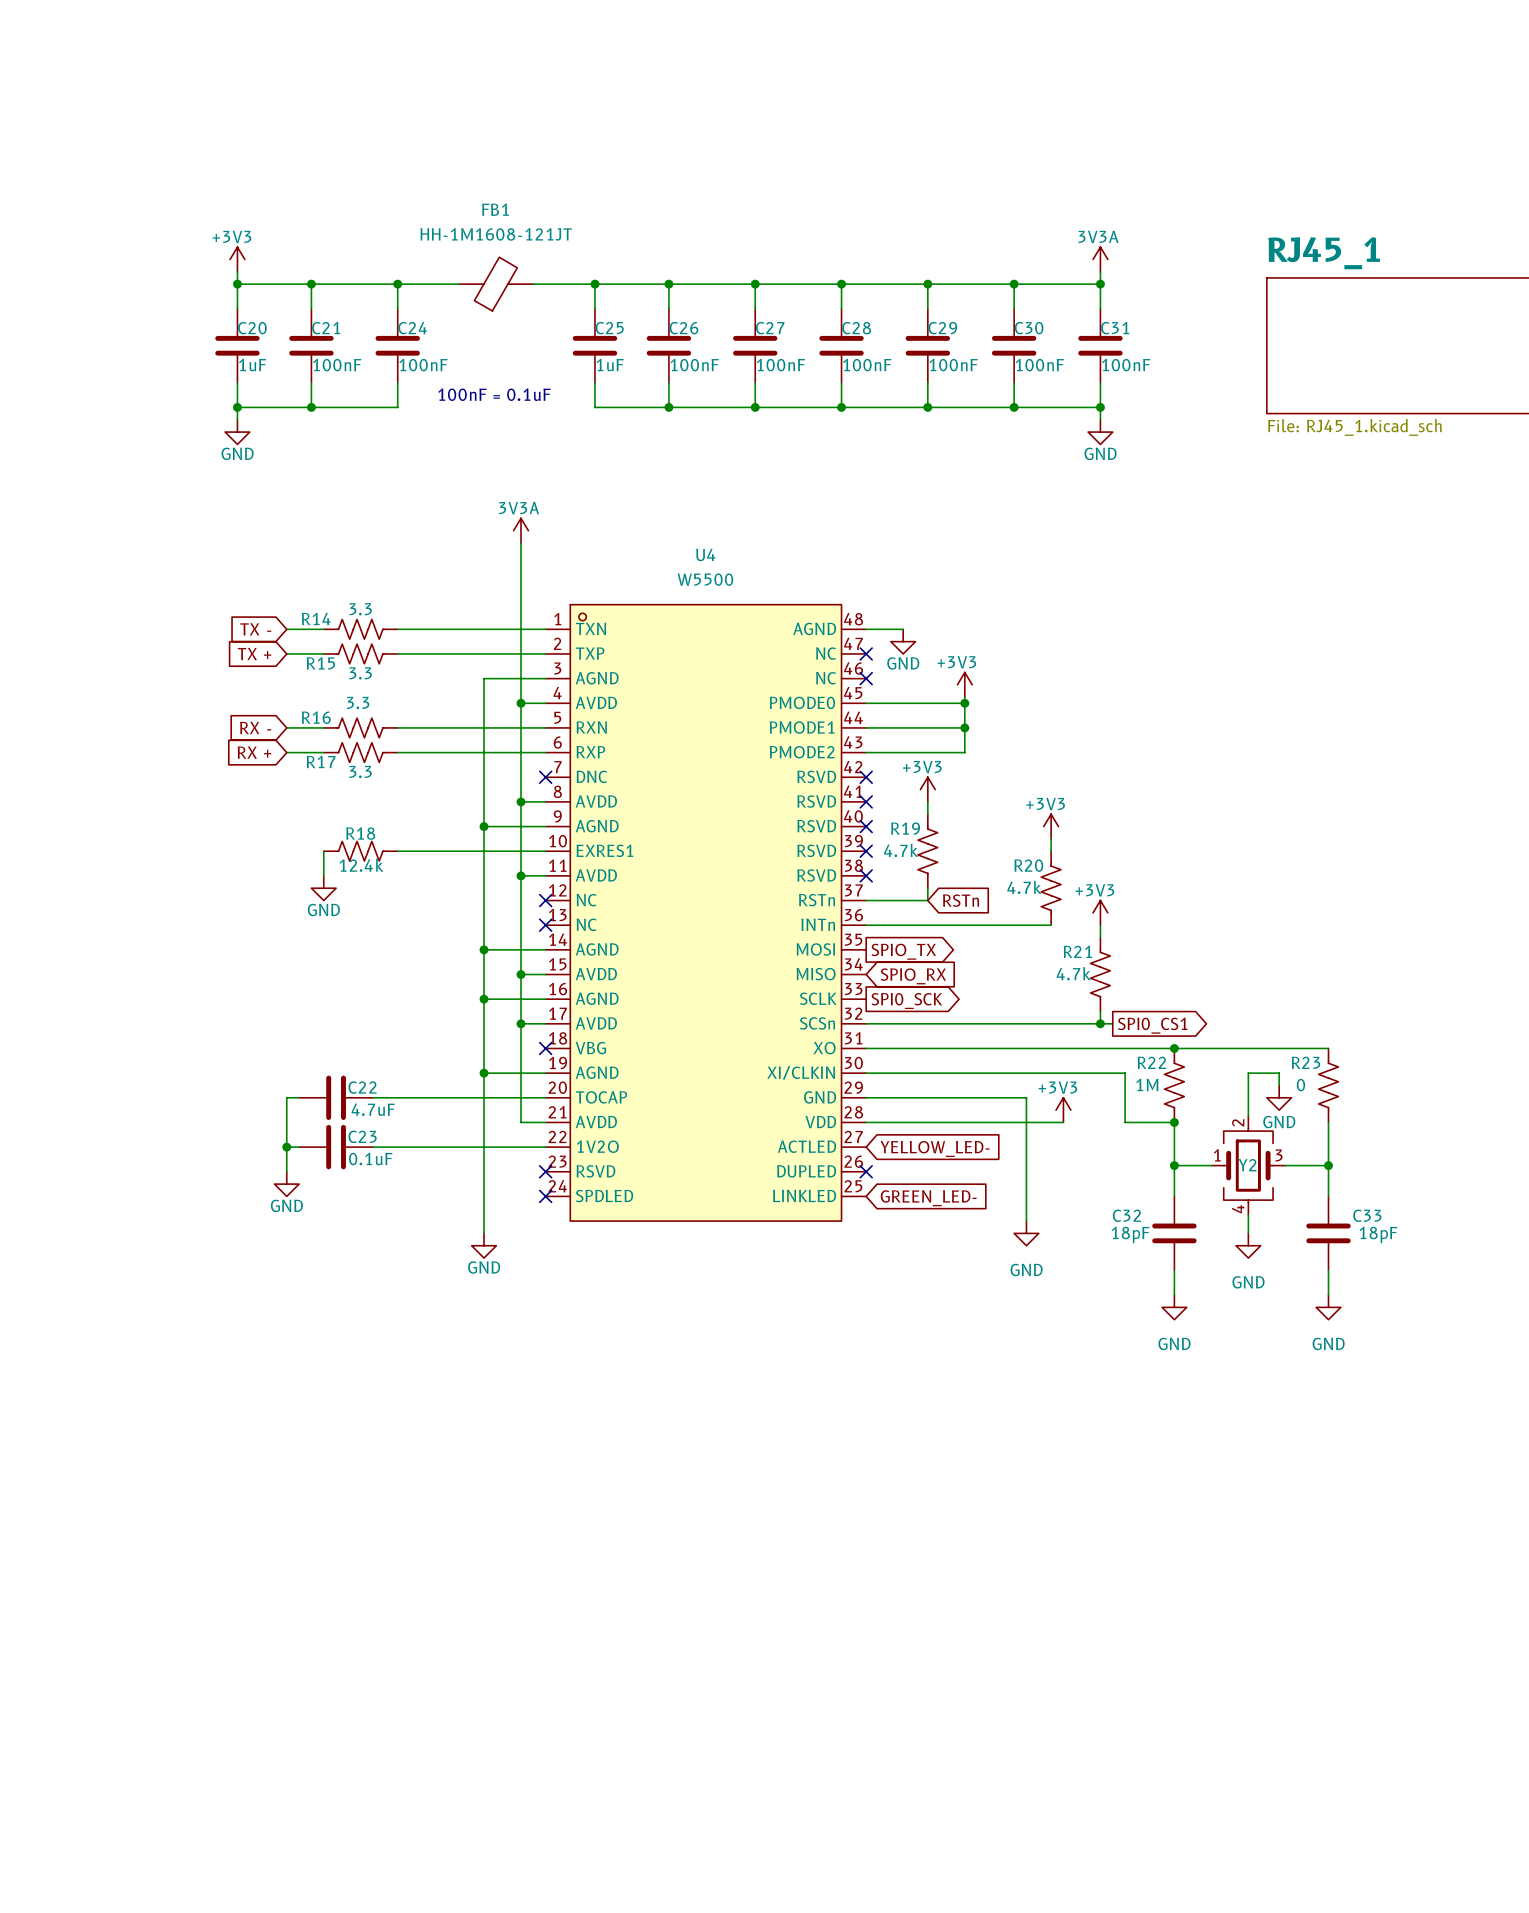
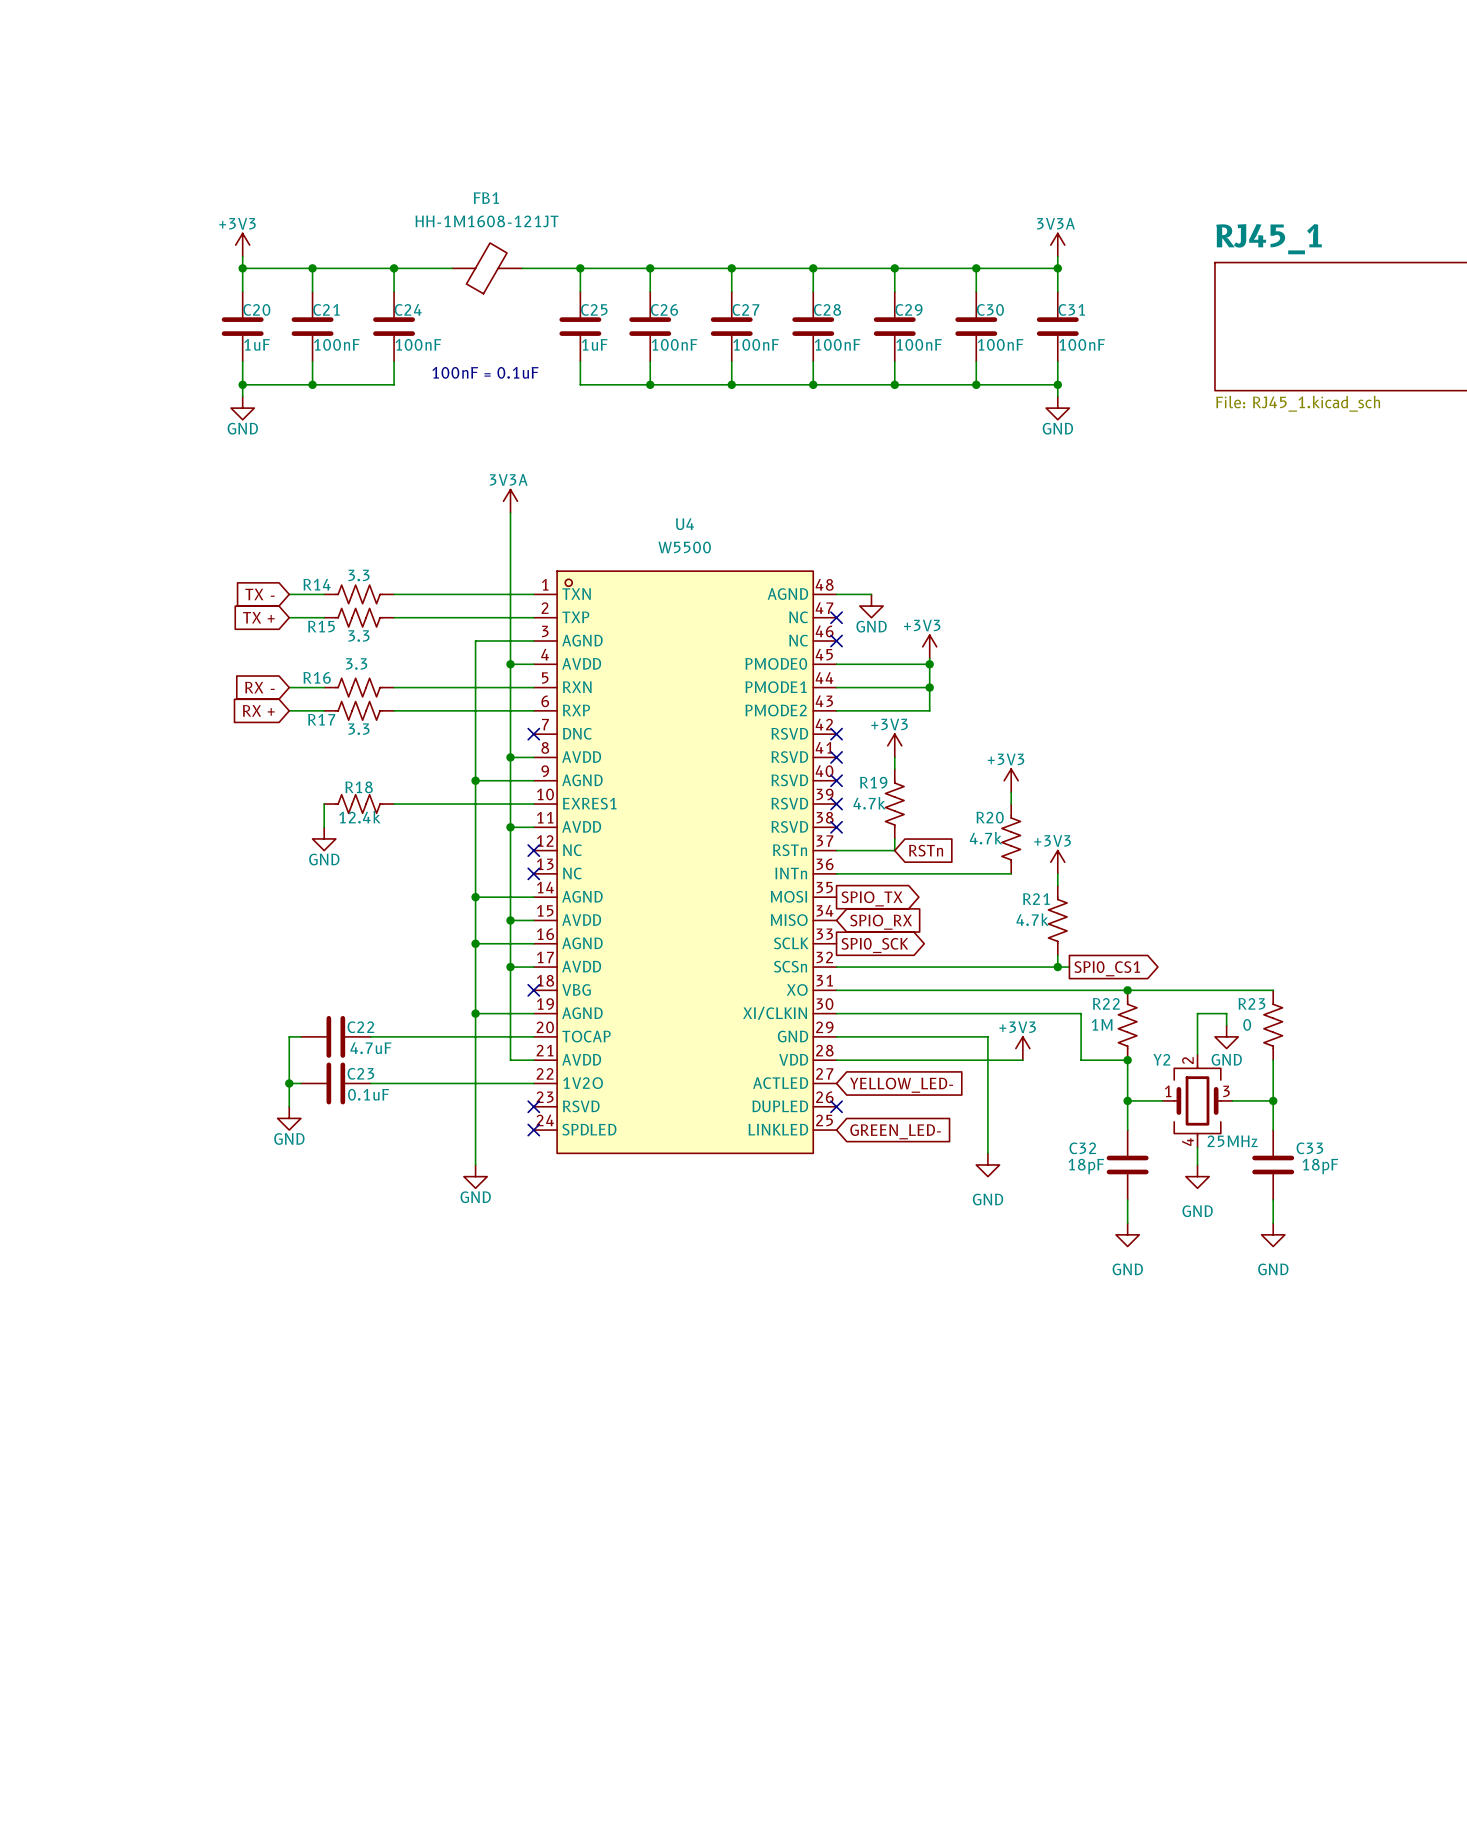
Y2 name position: Y2 (1247, 1165) -> Y2 (1161, 1059)
Y2 value: none -> 25MHz (1232, 1141)

